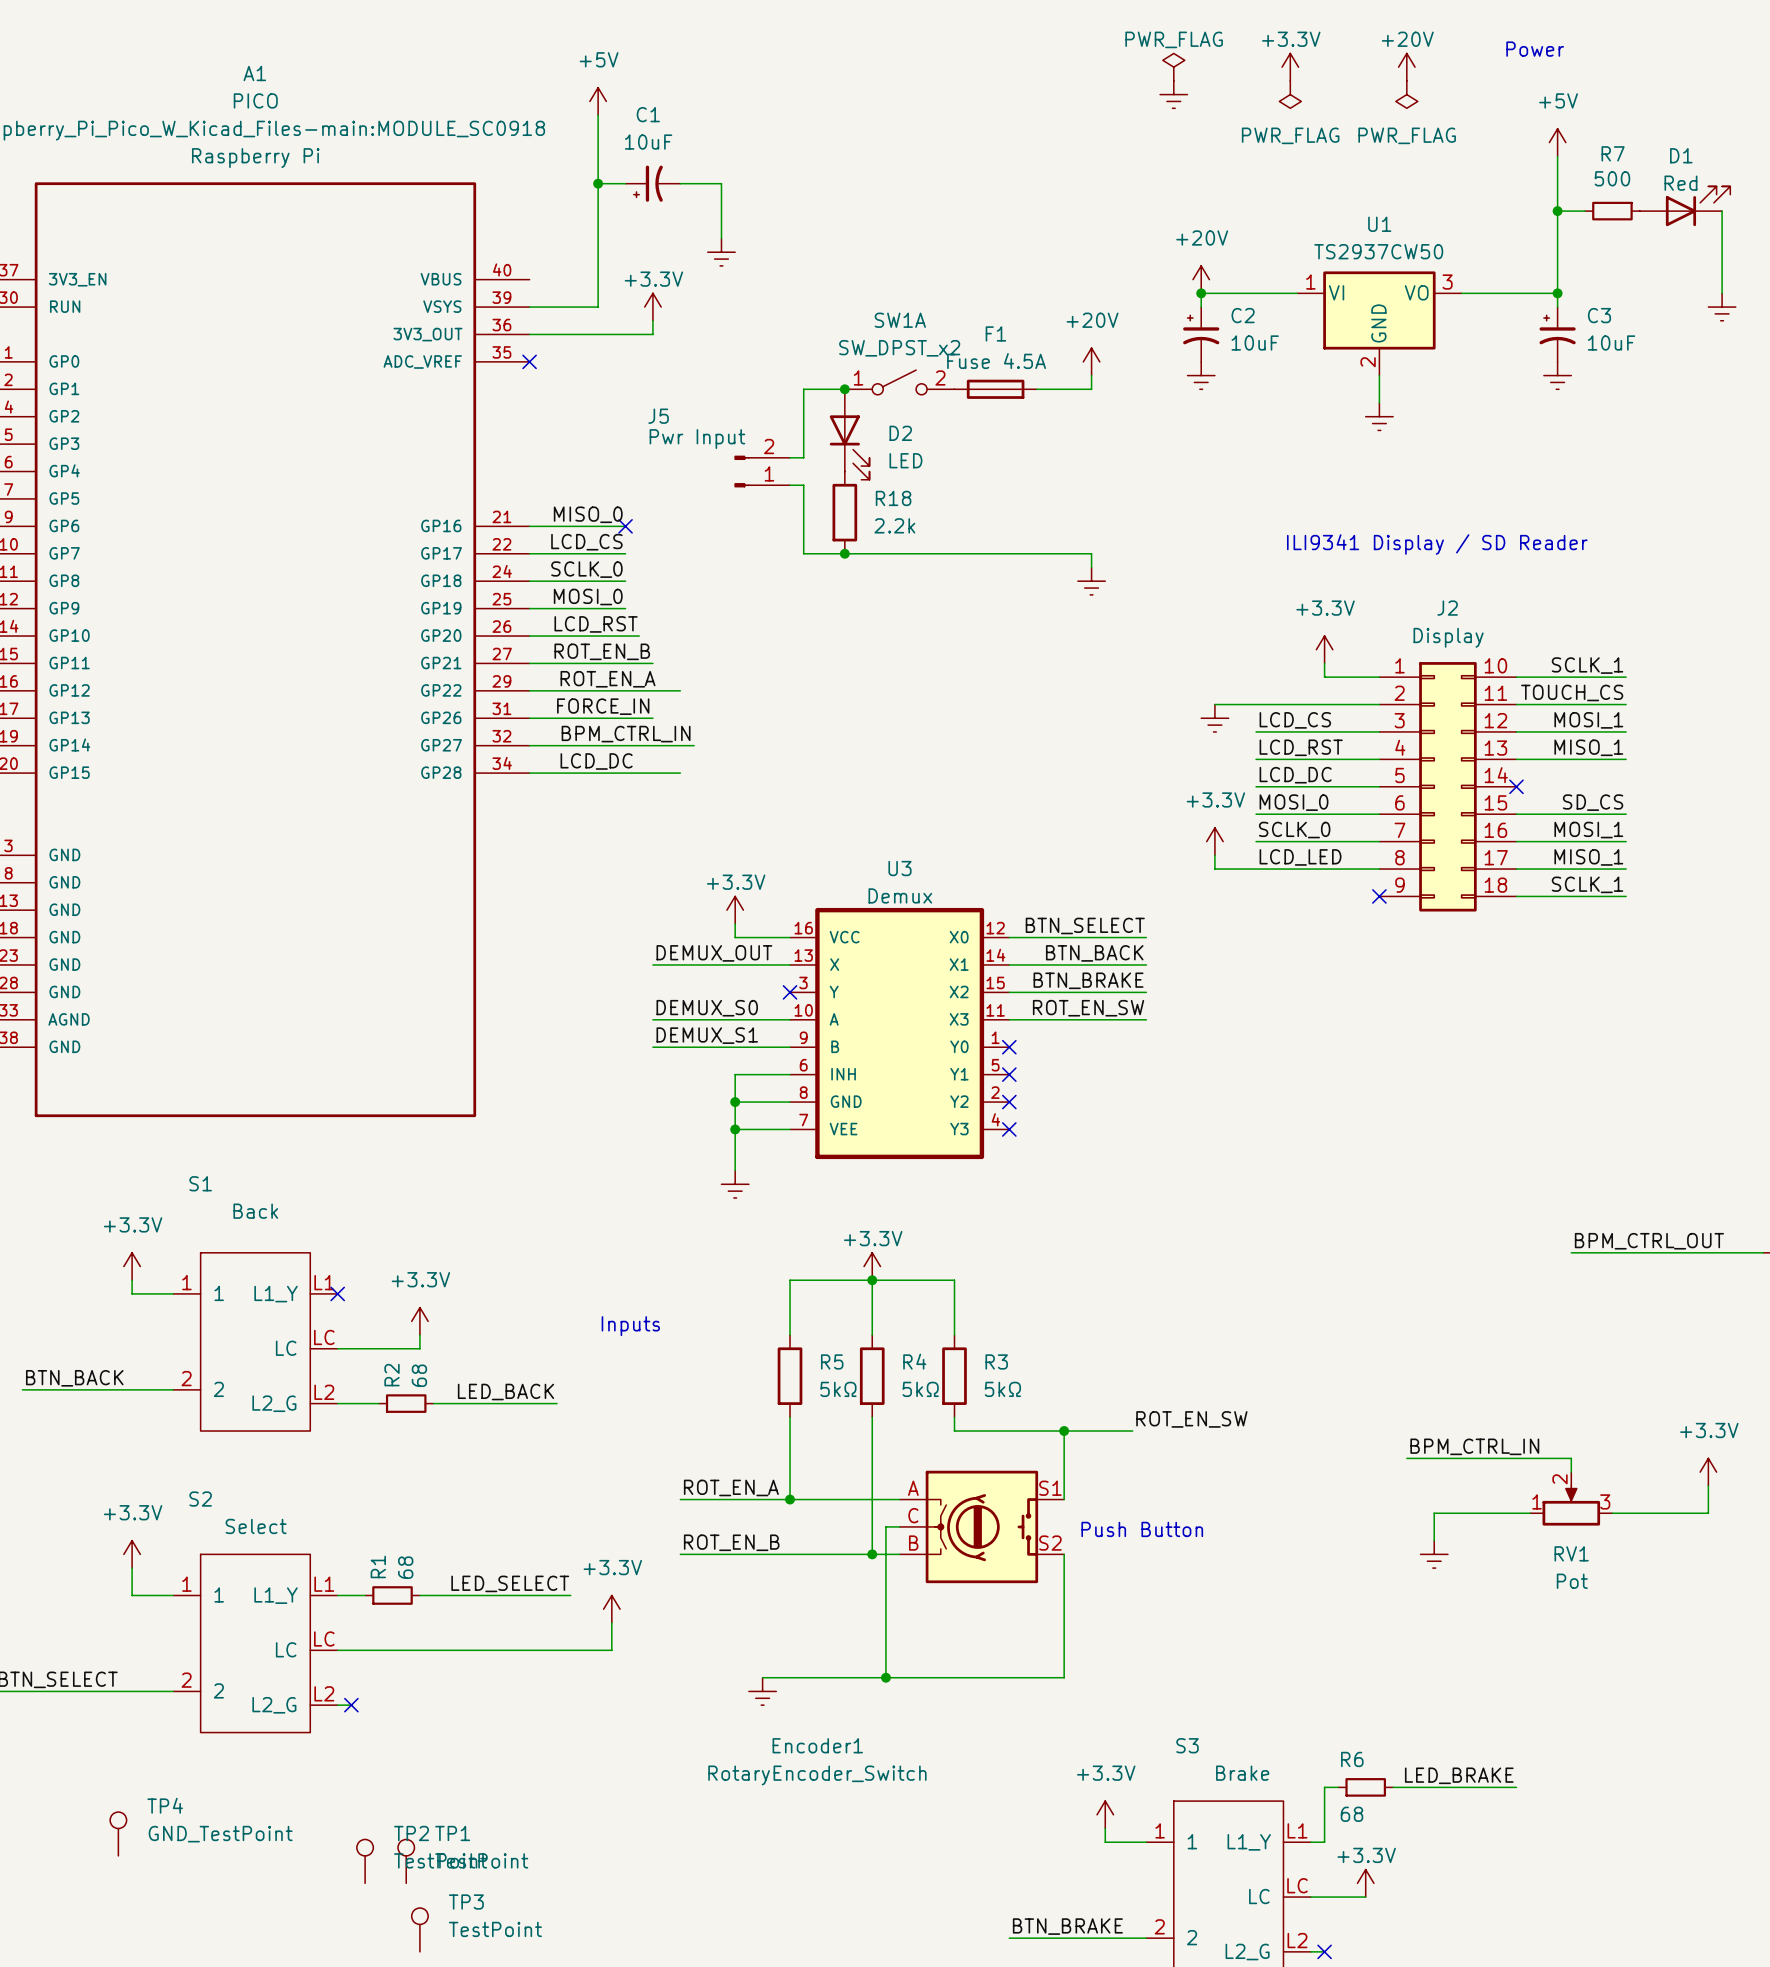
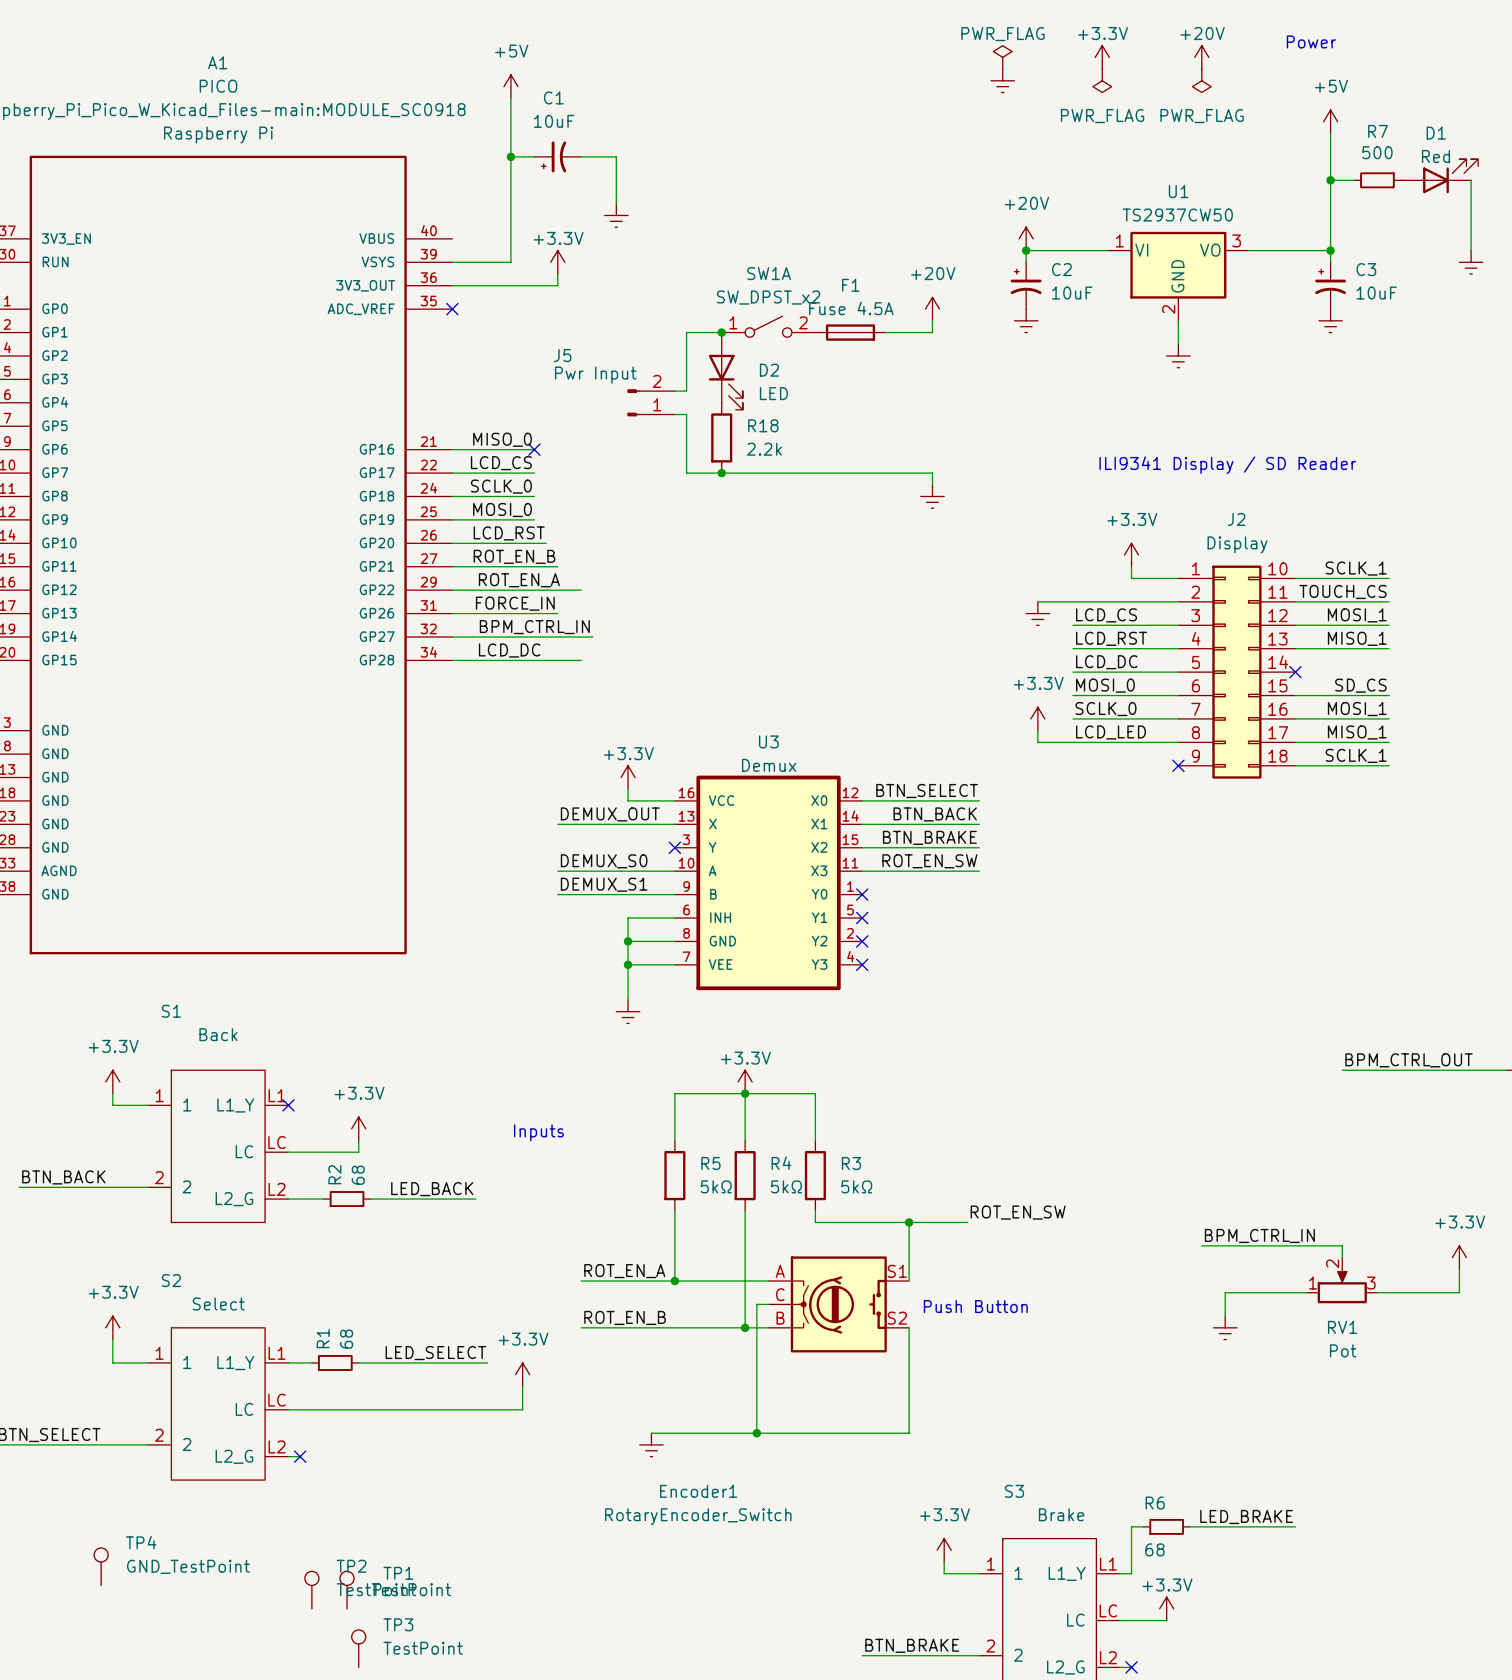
TP1 name position: TP1 (452, 1833) -> TP1 (398, 1573)

